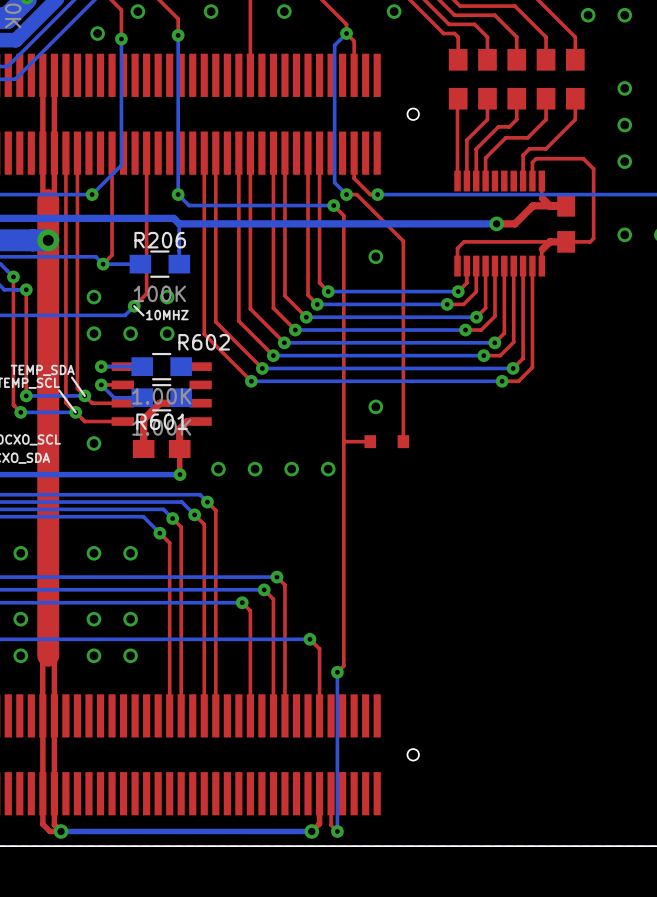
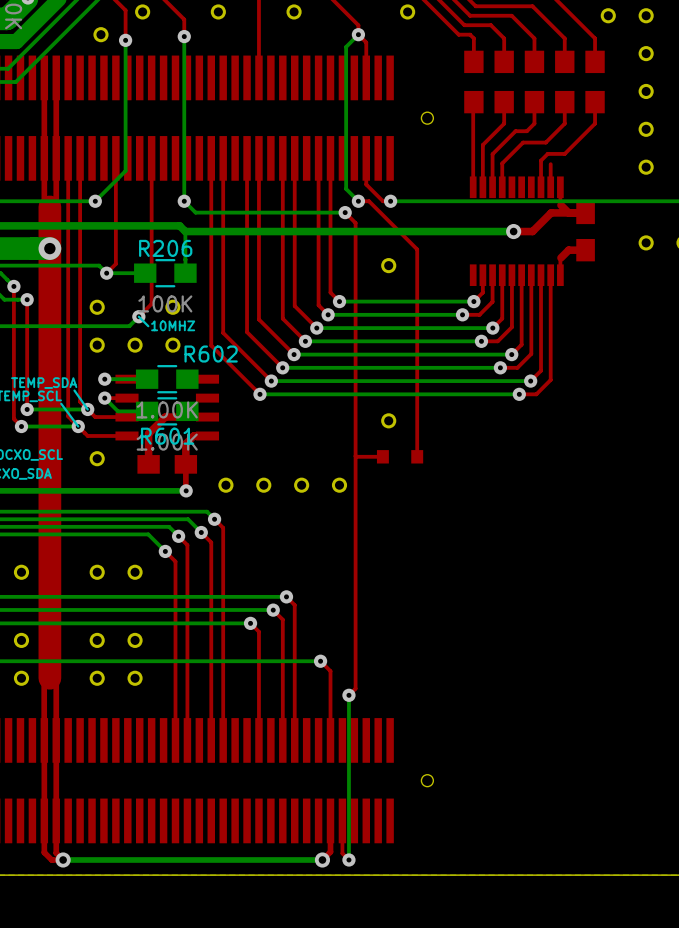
part: none -> (646, 53)
top track: (532, 162) (536, 158) (583, 158) (593, 168) (593, 238) (589, 242) (566, 241) -> (550, 167) (550, 164)
top track: (549, 241) (463, 241) (457, 248) (457, 266) -> none

